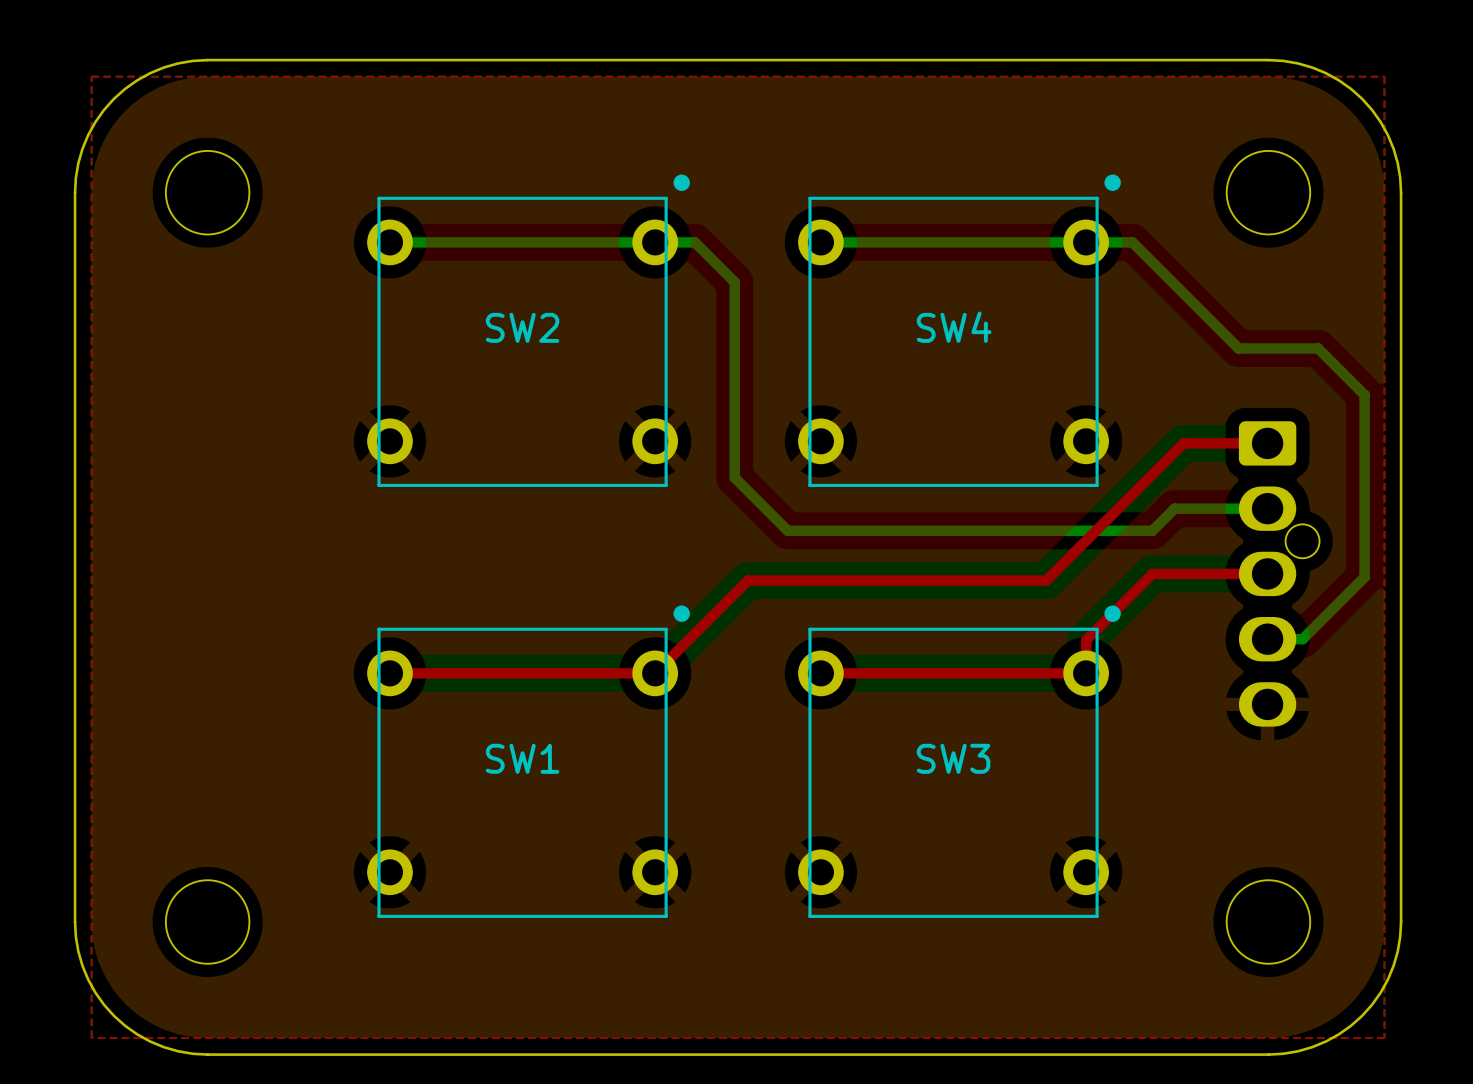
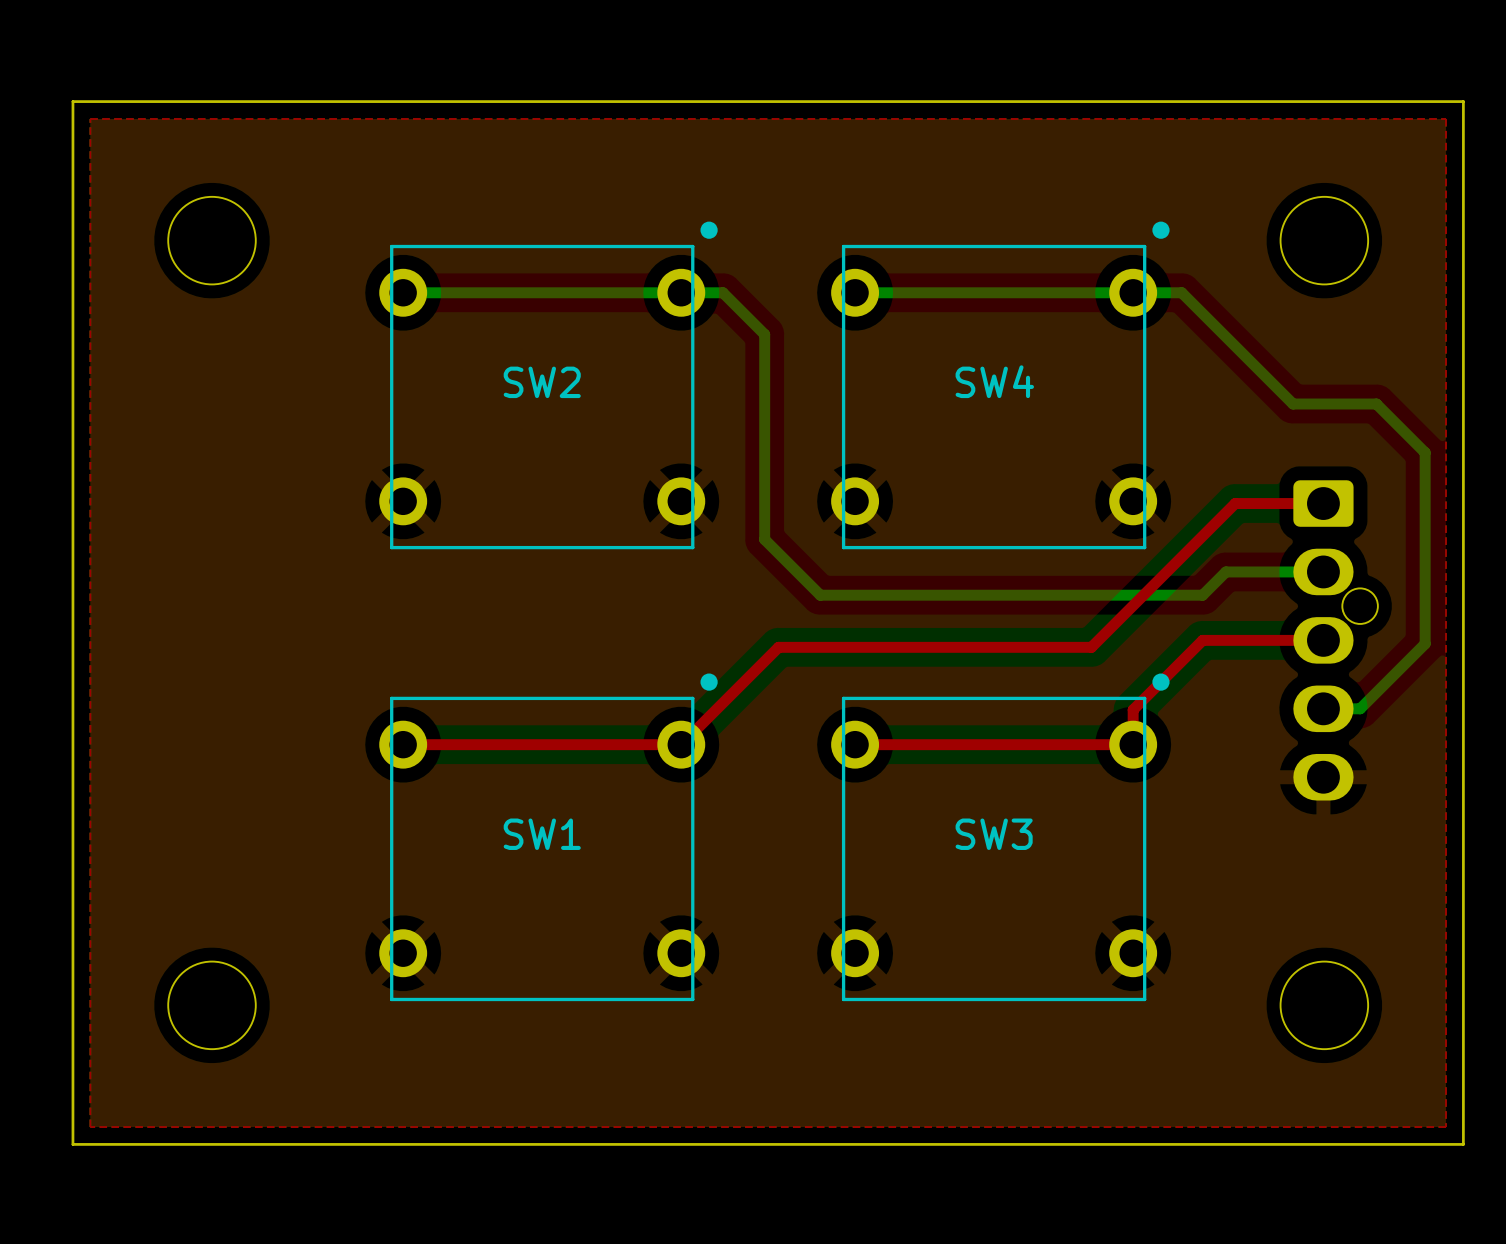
board edge: (207, 60) (178, 63) (150, 73) (137, 80) (113, 98) (95, 122) (82, 148) (78, 163) (75, 192) -> (212, 101) (72, 101) (72, 240)
board edge: (1268, 60) (1297, 63) (1325, 73) (1351, 89) (1362, 98) (1372, 110) (1387, 135) (1397, 163) (1401, 192) -> (1324, 101) (1463, 101) (1463, 240)
board edge: (75, 922) (75, 936) (82, 965) (95, 992) (113, 1015) (124, 1025) (150, 1041) (178, 1051) (207, 1054) -> (72, 1005) (72, 1144) (212, 1144)
board edge: (1401, 922) (1397, 951) (1393, 965) (1380, 992) (1362, 1015) (1351, 1025) (1325, 1041) (1297, 1051) (1268, 1054) -> (1463, 1005) (1463, 1144) (1324, 1144)

